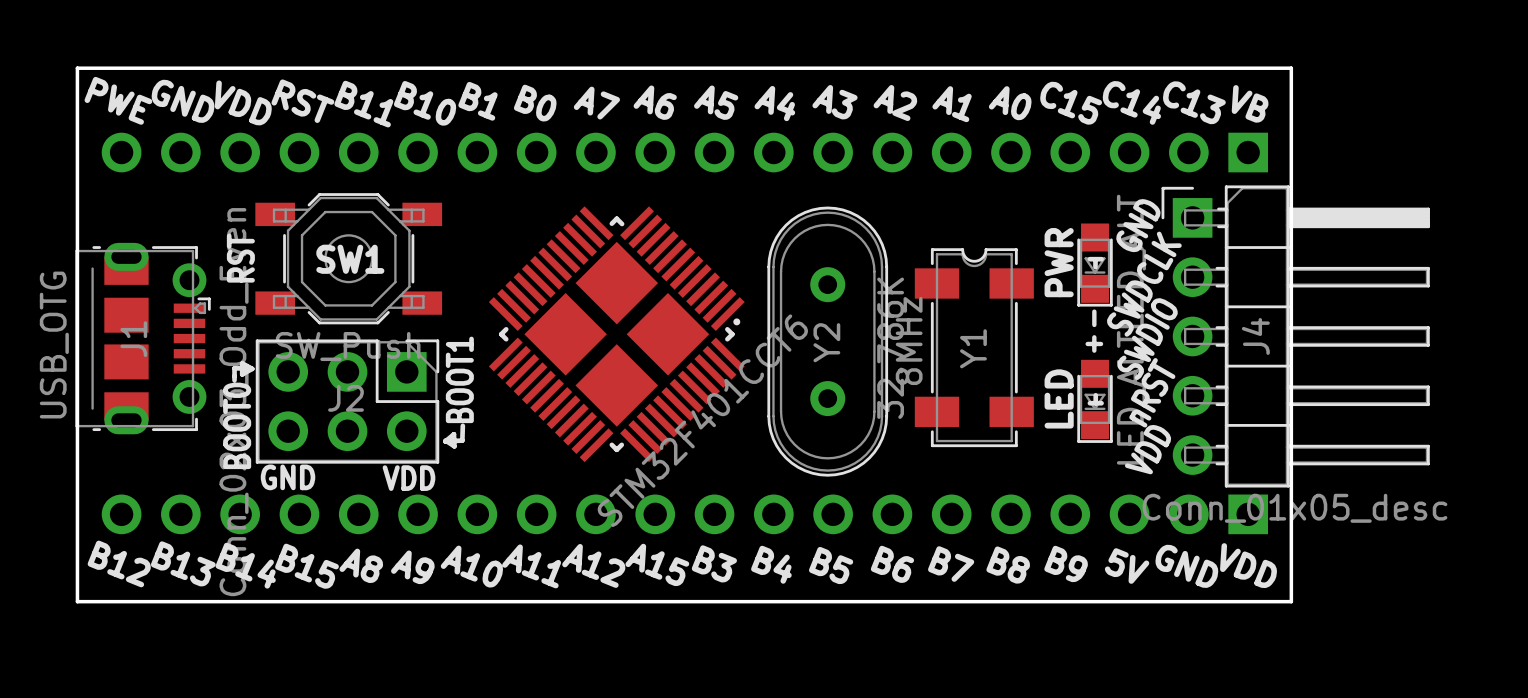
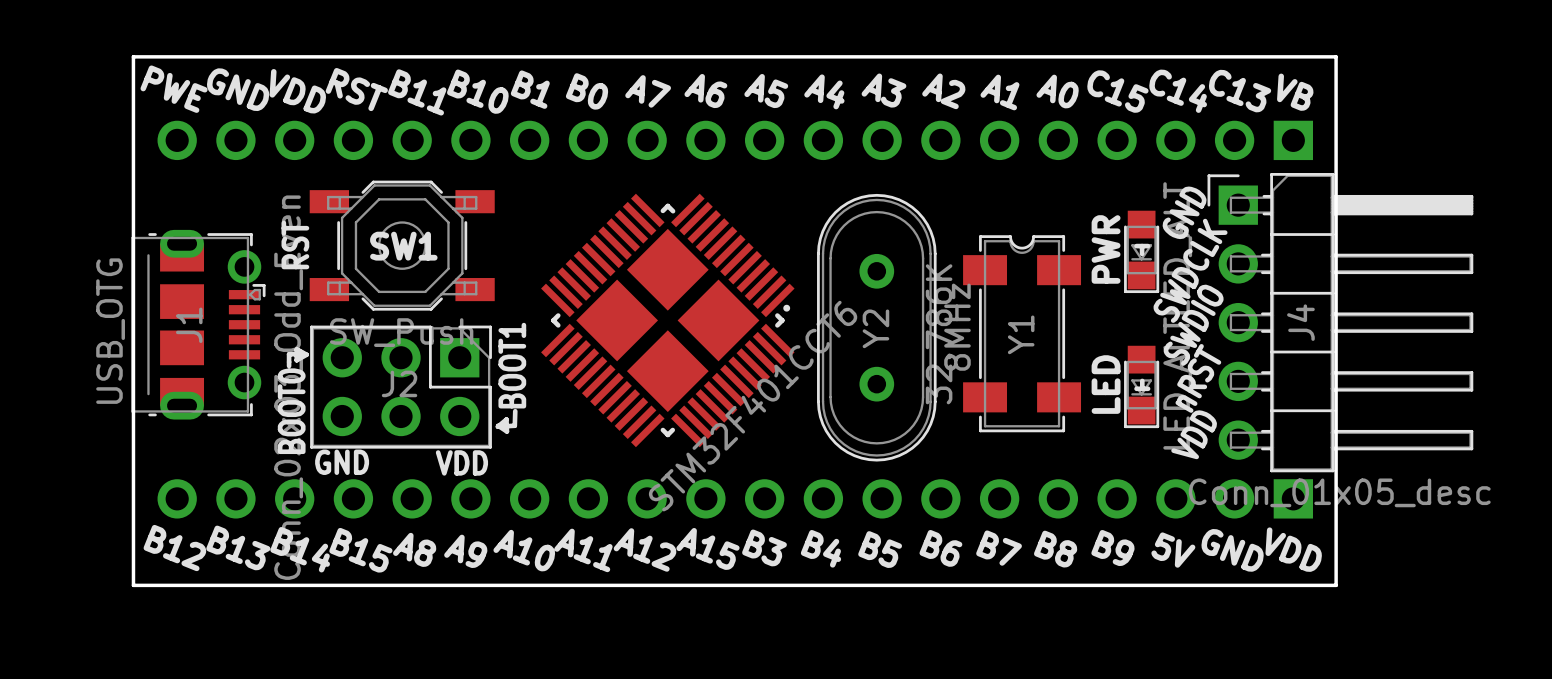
text: - (1094, 318) -> none
text: + (1094, 343) -> none

